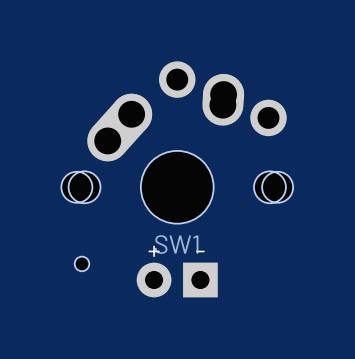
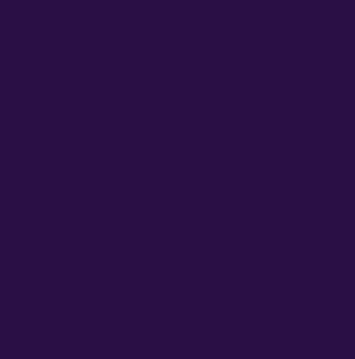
SW1: (177, 179) -> none

